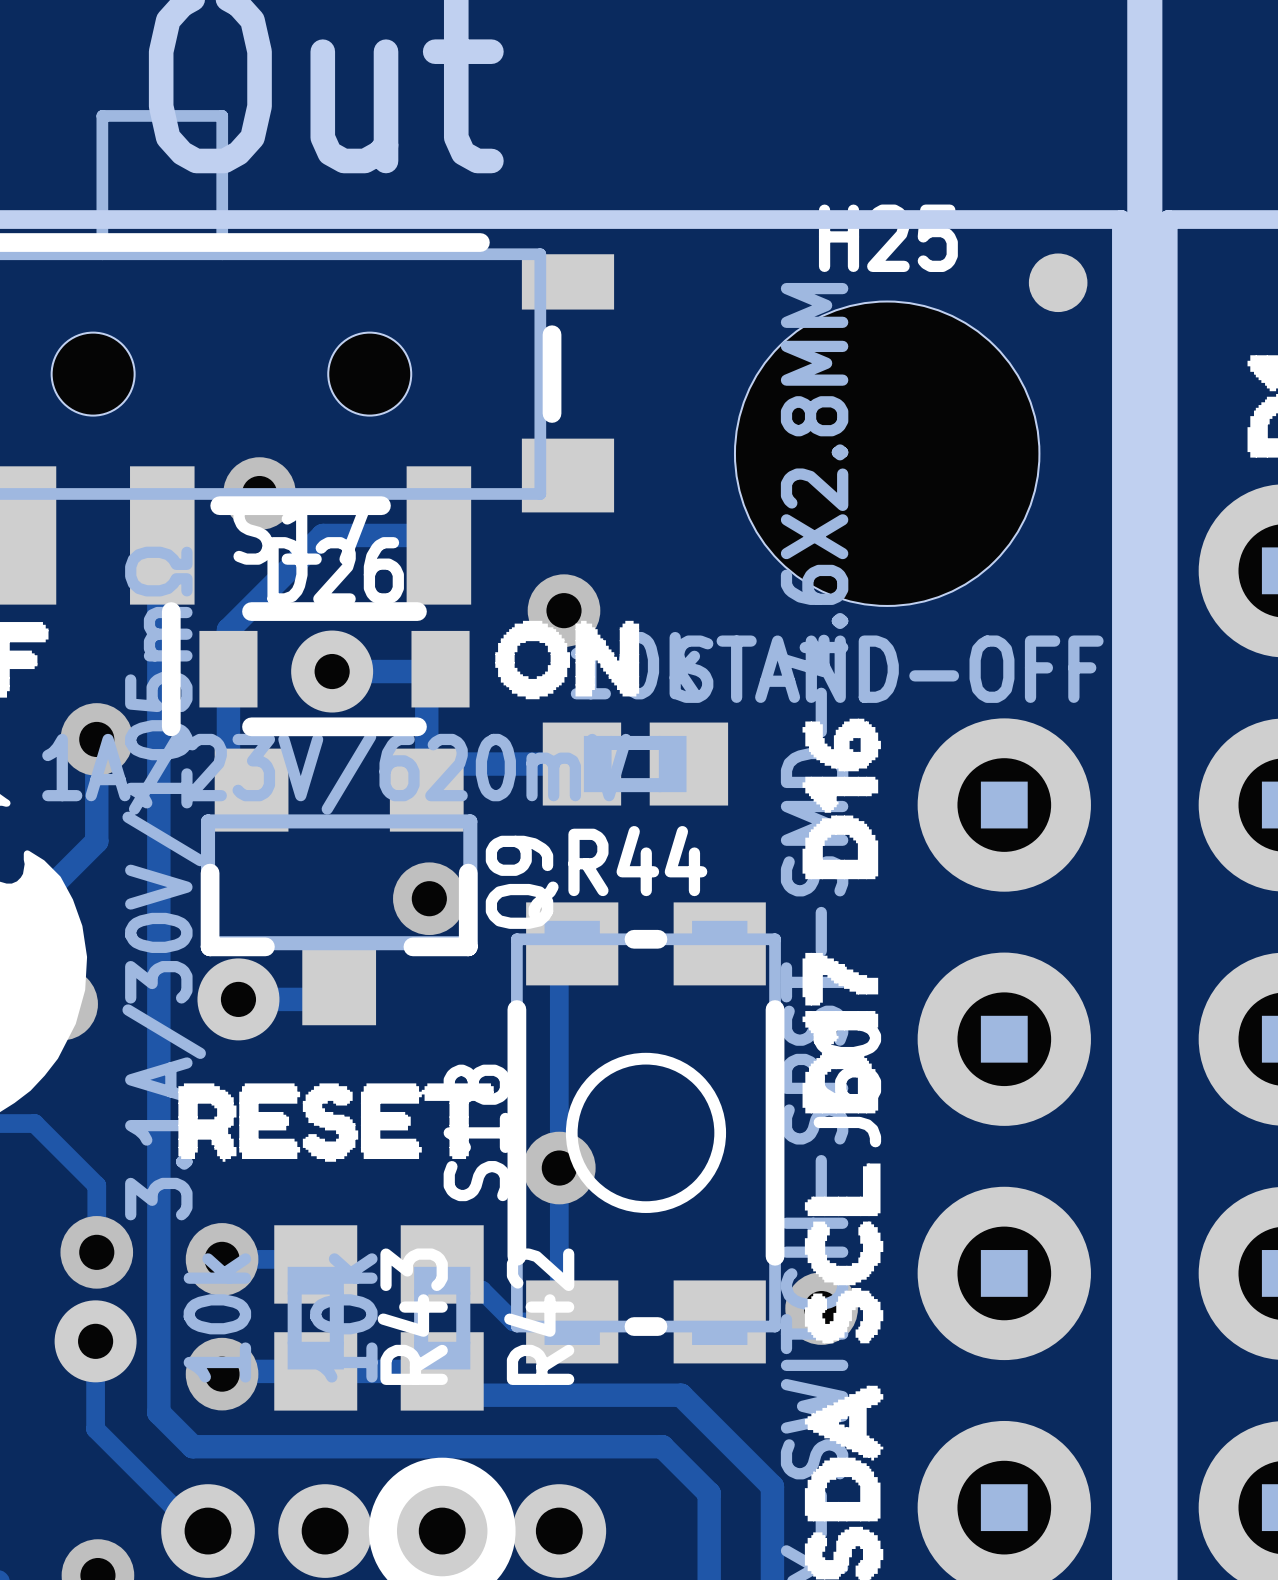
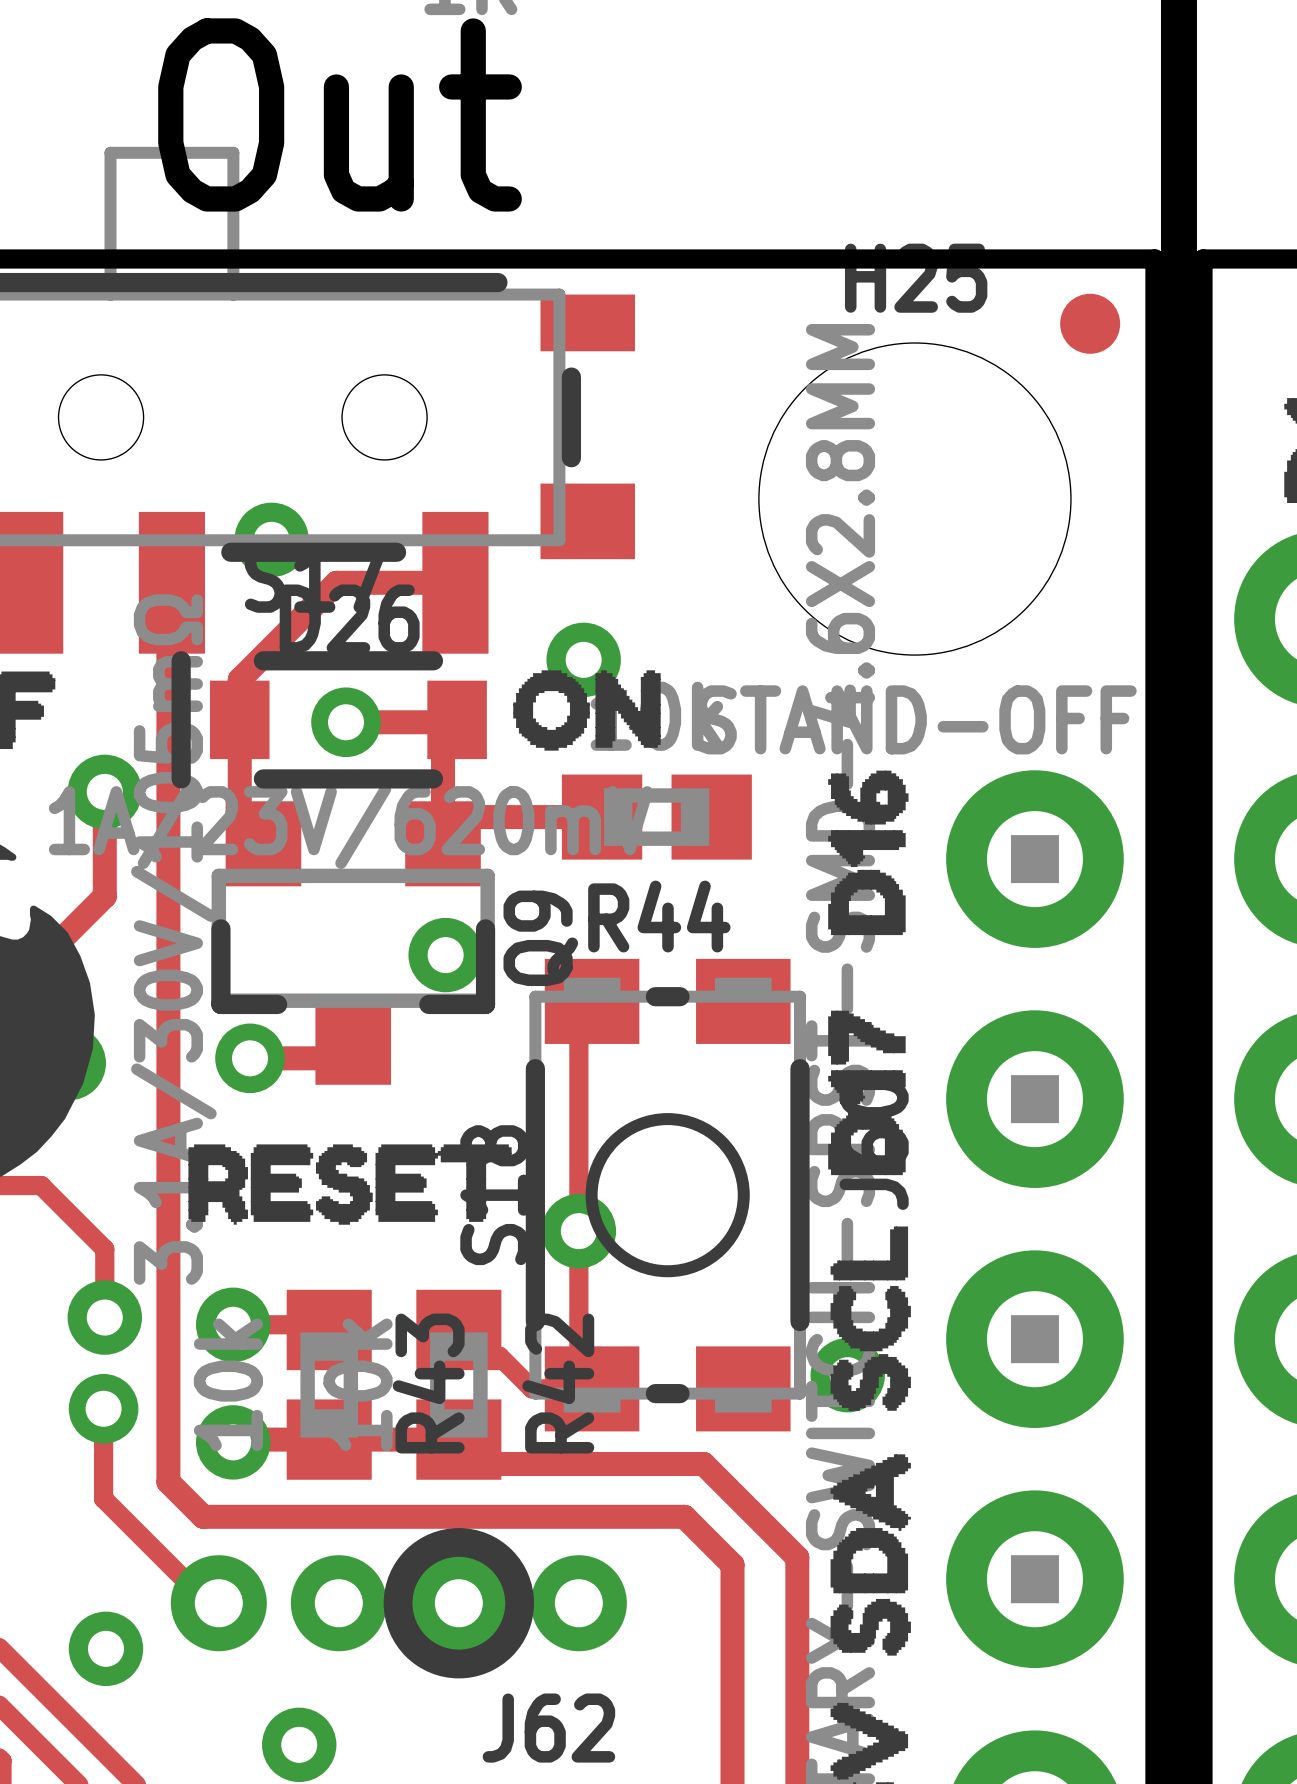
part footprint: [291, 630, 374, 713] -> [311, 687, 381, 758]
part footprint: [197, 958, 280, 1041] -> [215, 1023, 285, 1094]
part footprint: [54, 1300, 137, 1383] -> [68, 1373, 139, 1444]

